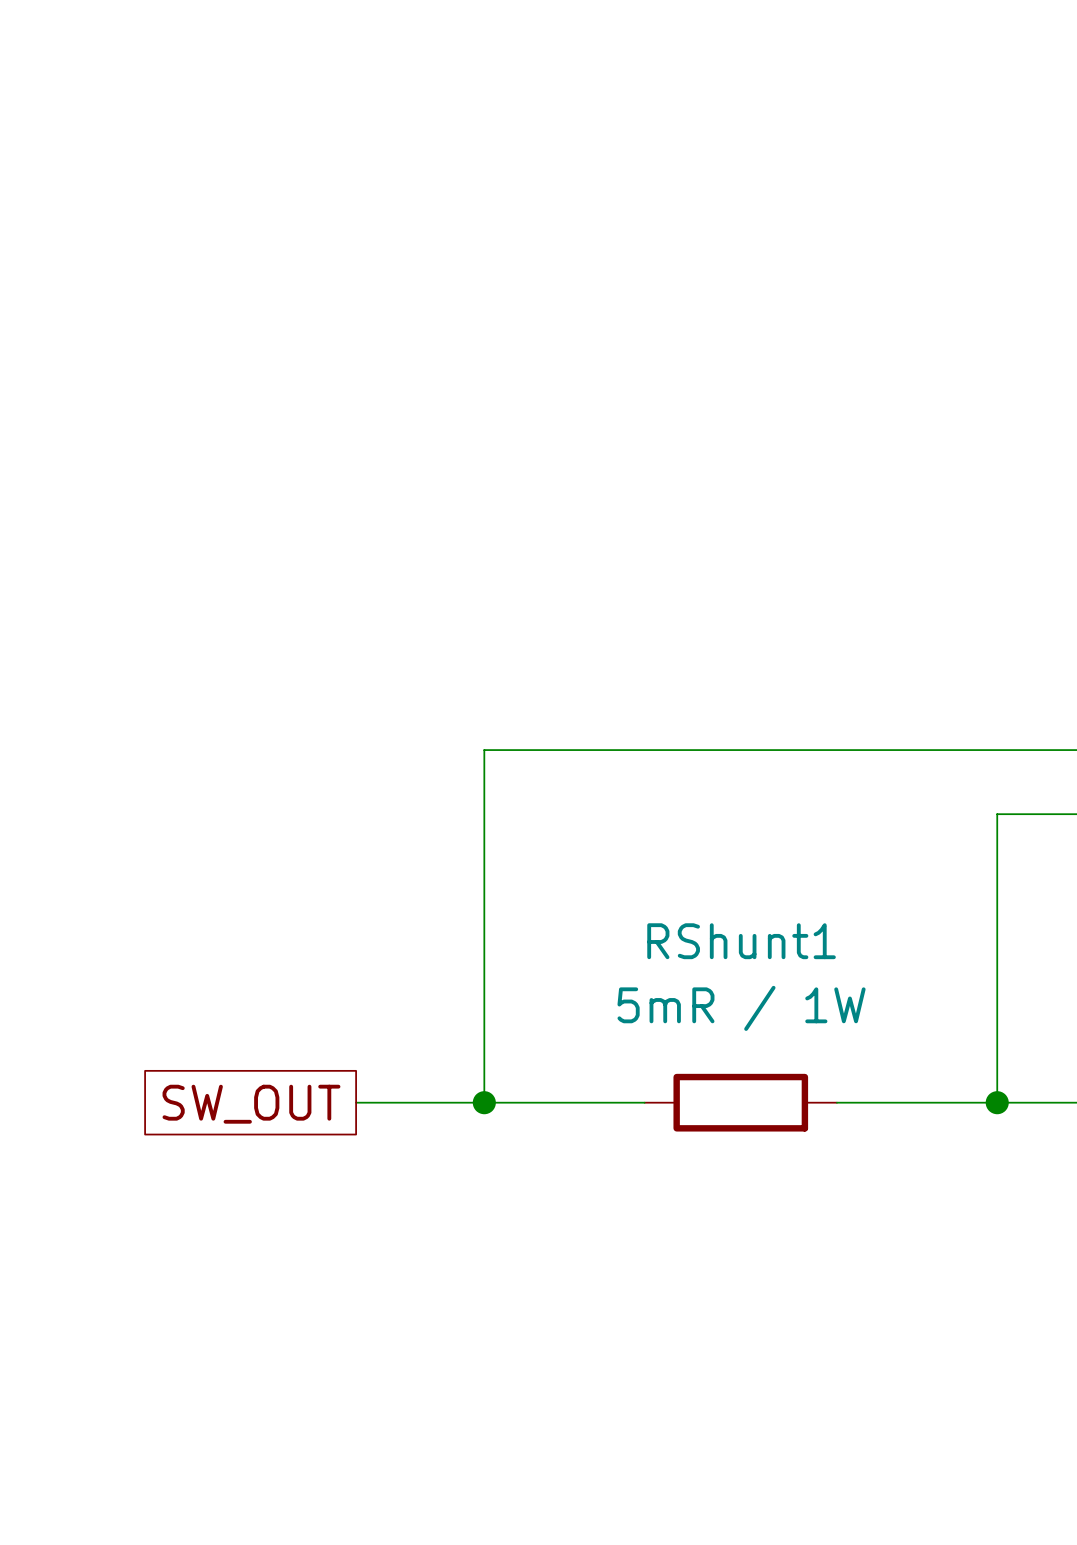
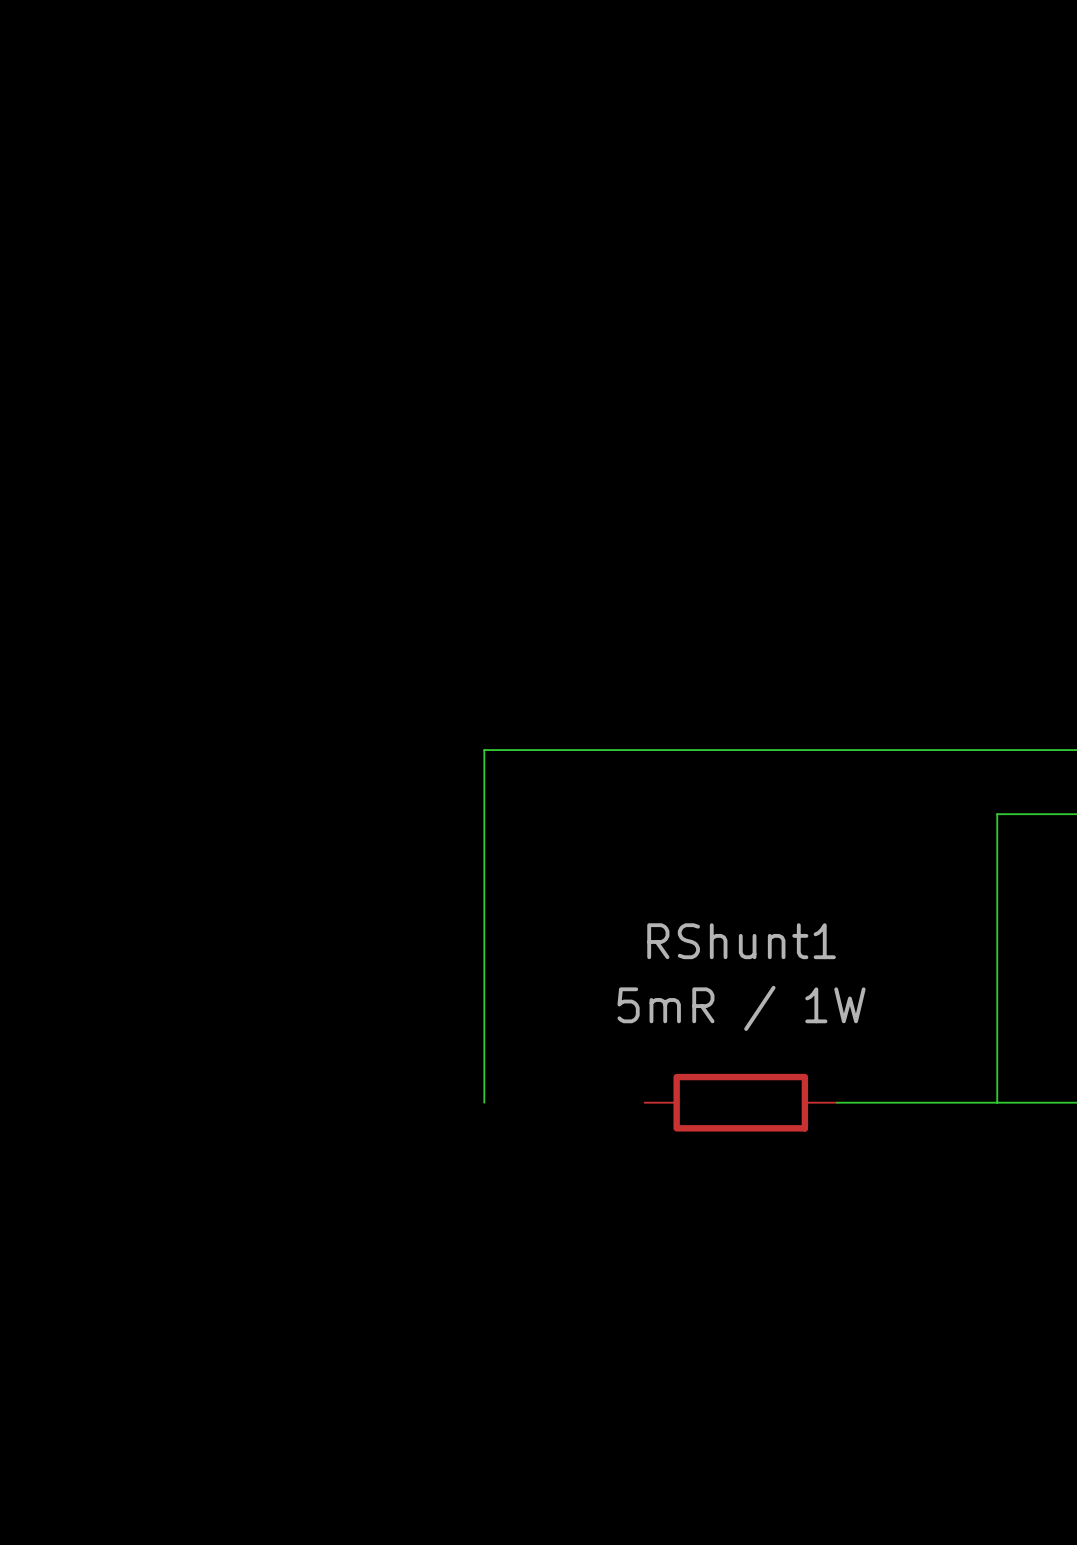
wire: (356, 1102) (644, 1102) -> none
junction: (484, 1102) -> none
junction: (997, 1102) -> none
global label: SW_OUT (251, 1104) -> none

